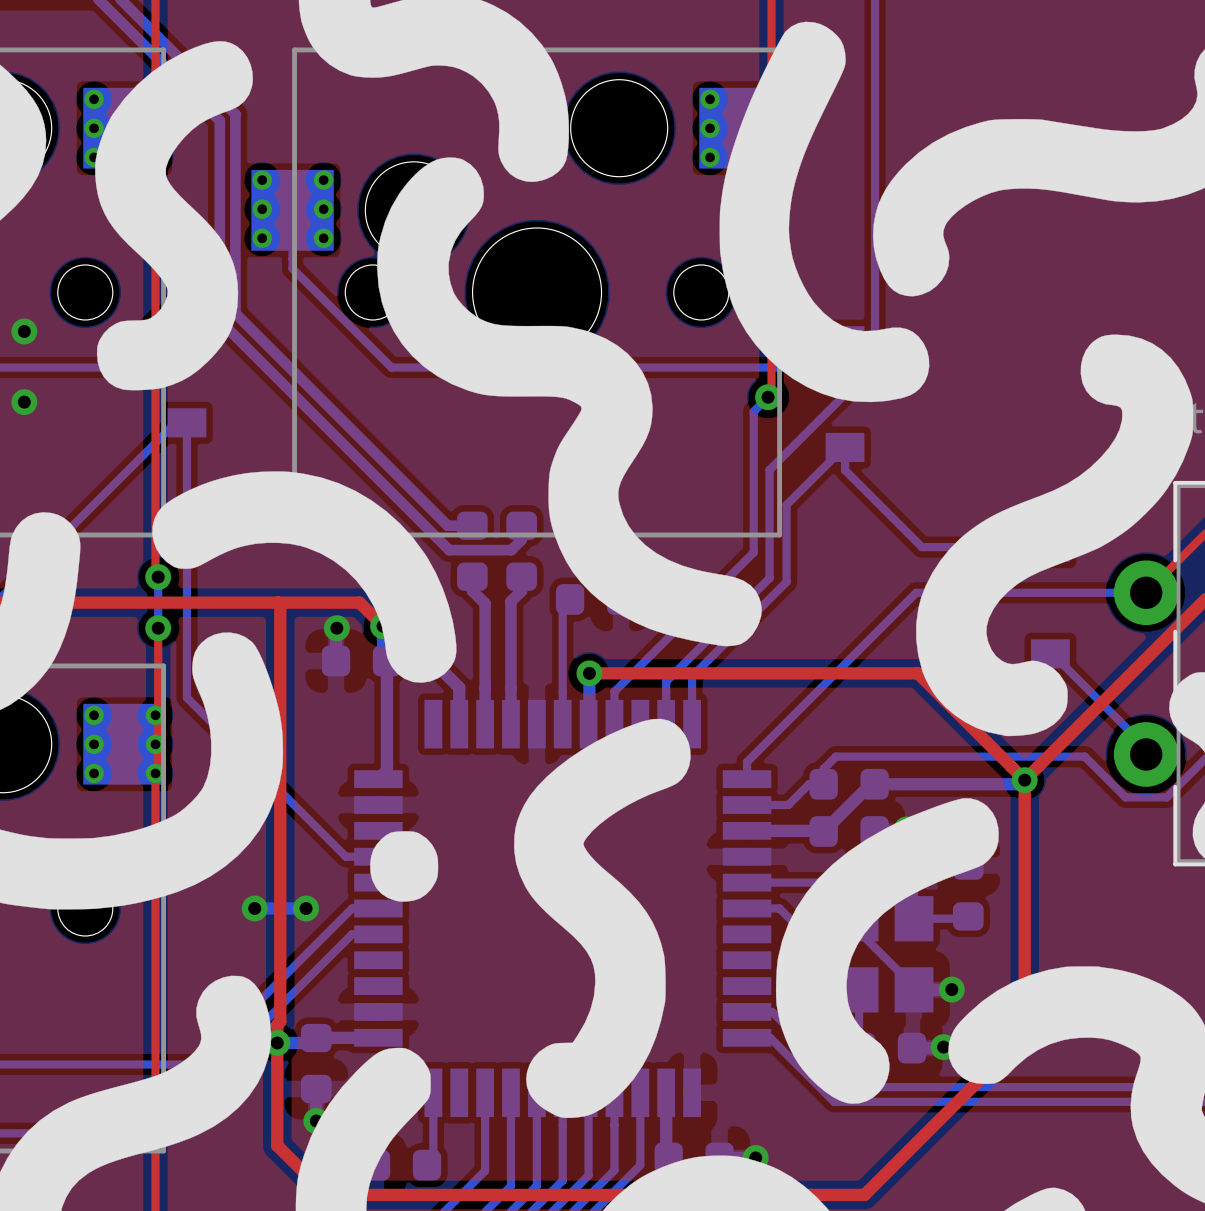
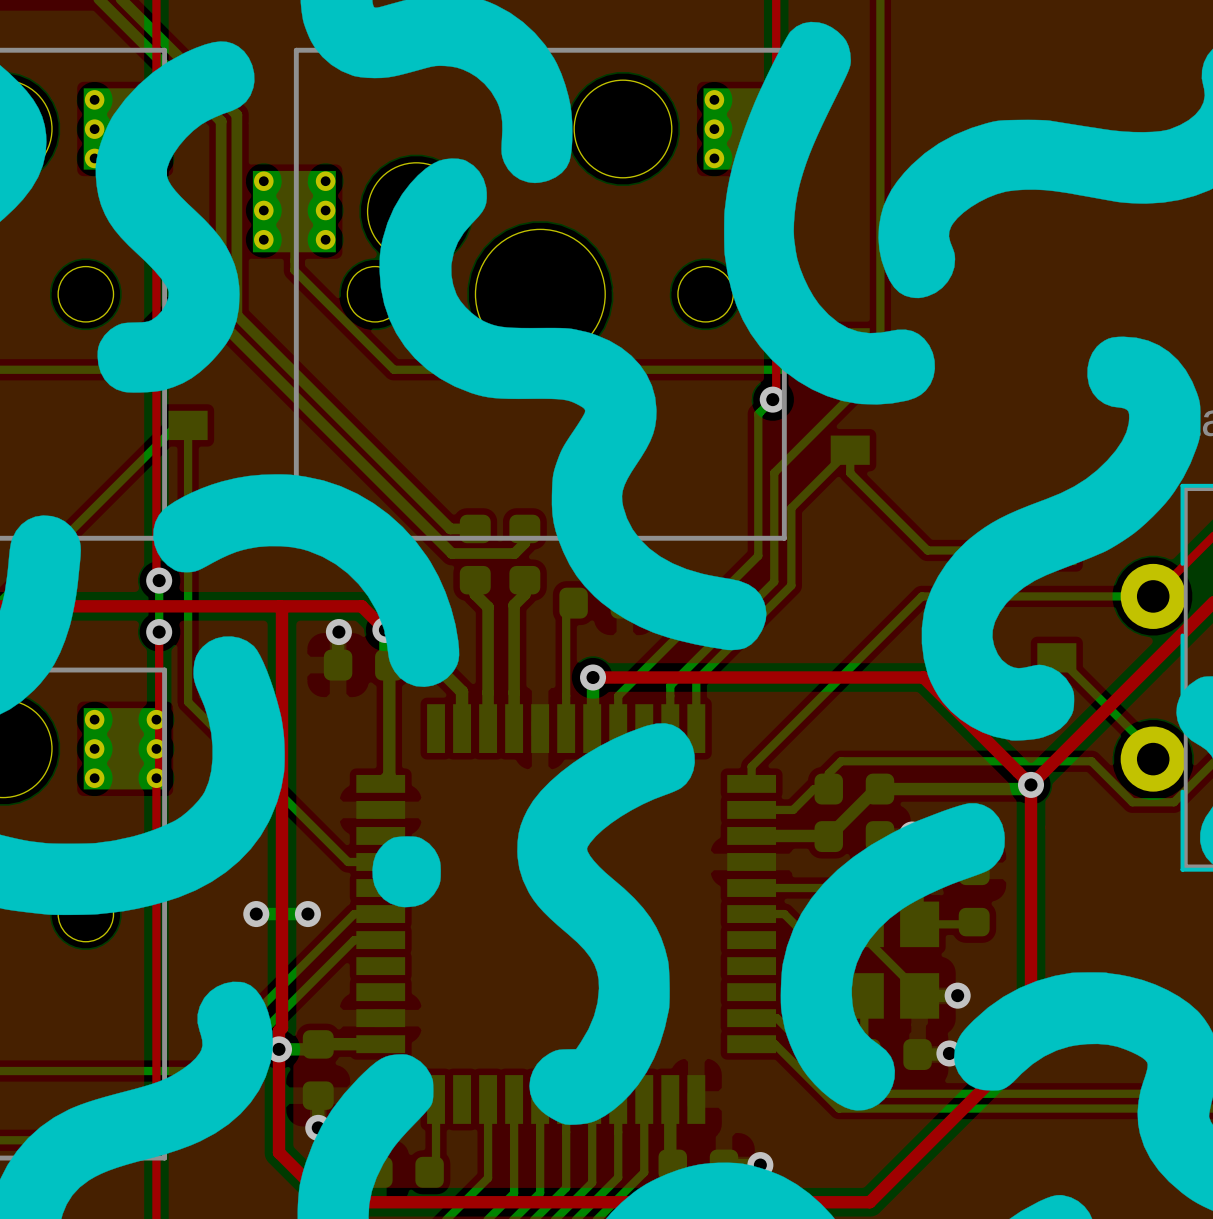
via: (24, 331) -> none
via: (24, 402) -> none

